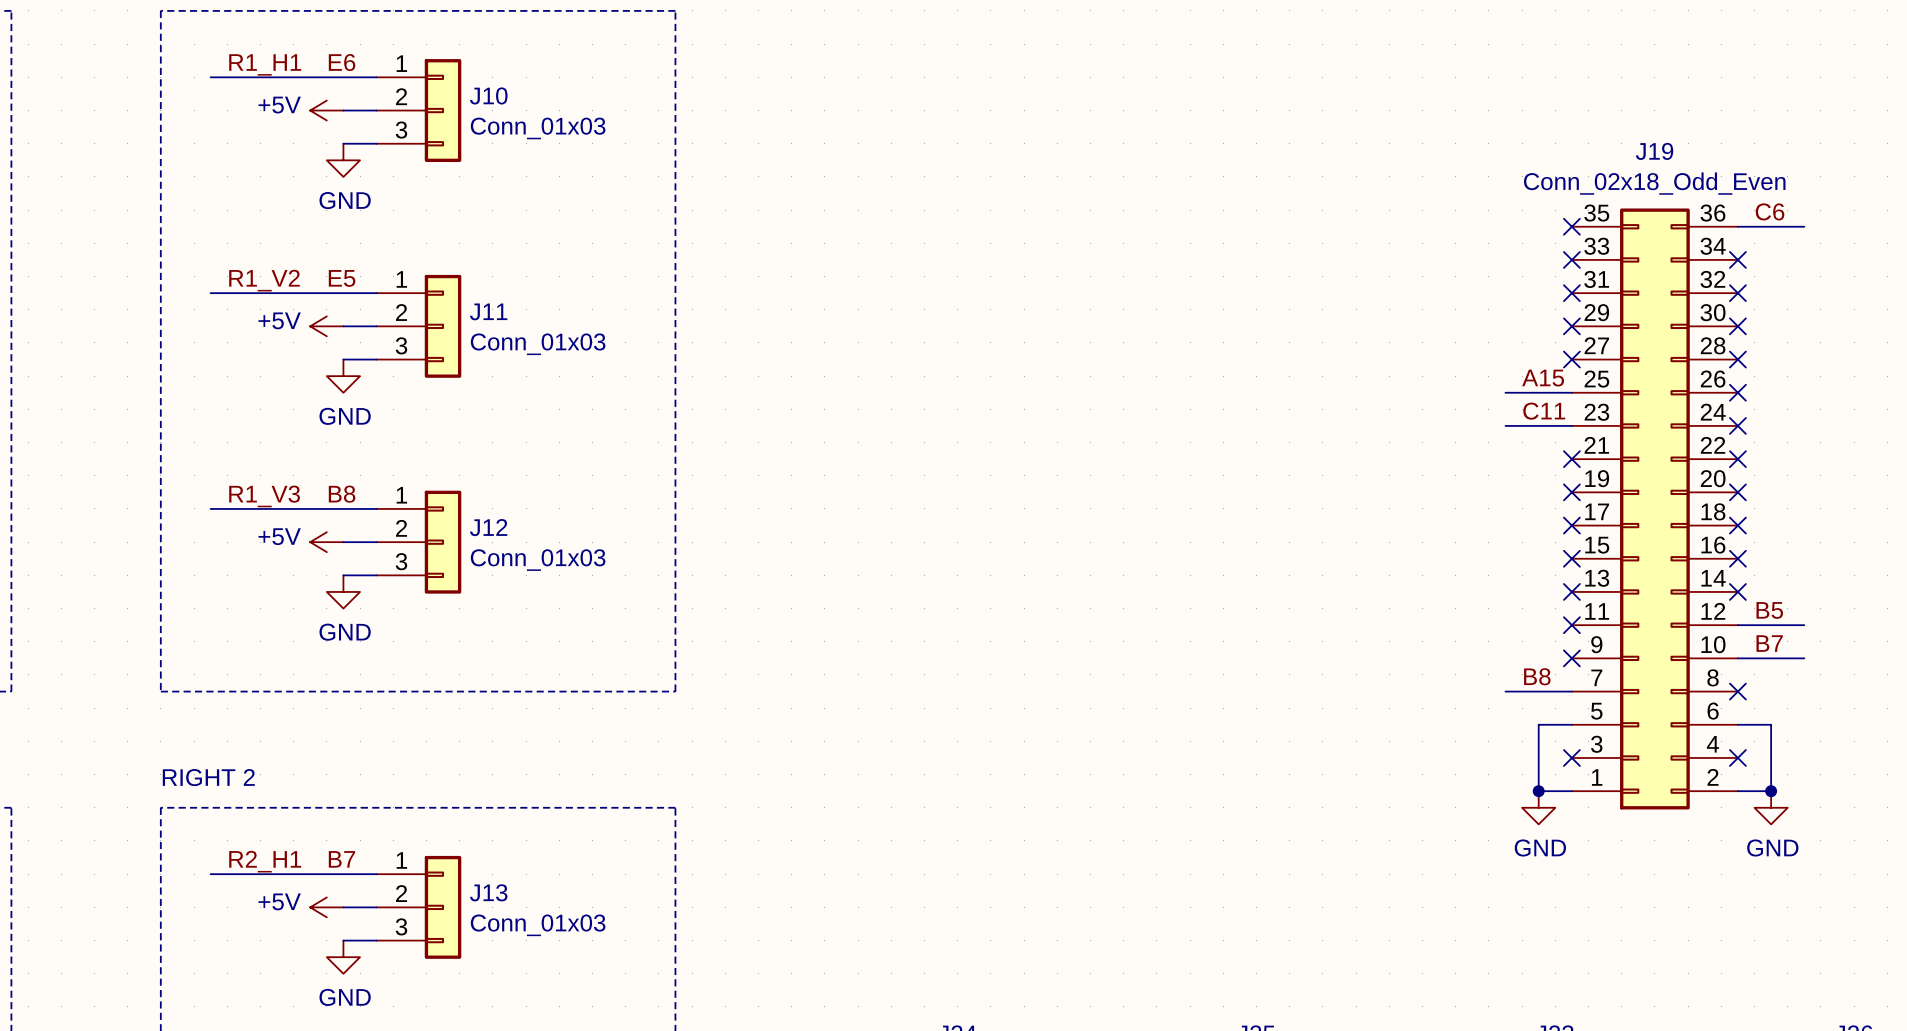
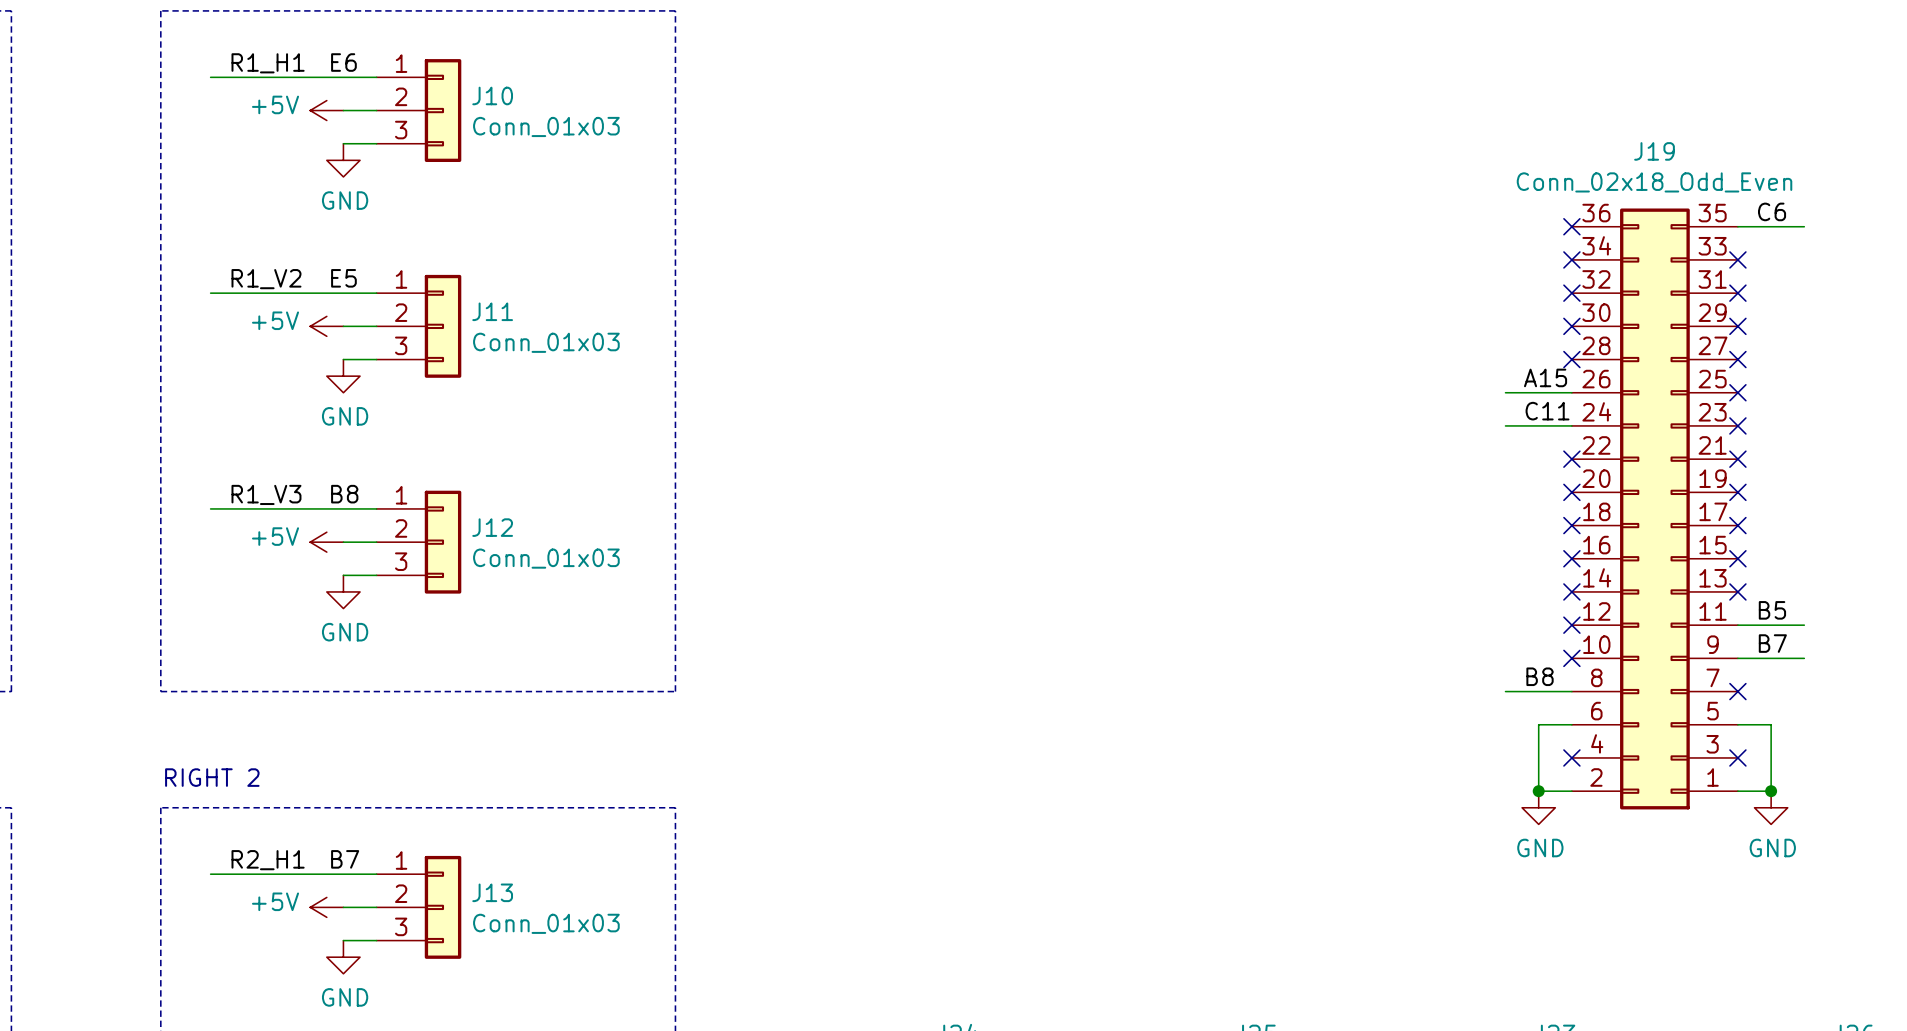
J19 flip: as is (1654, 508) -> left-right (1654, 508)

